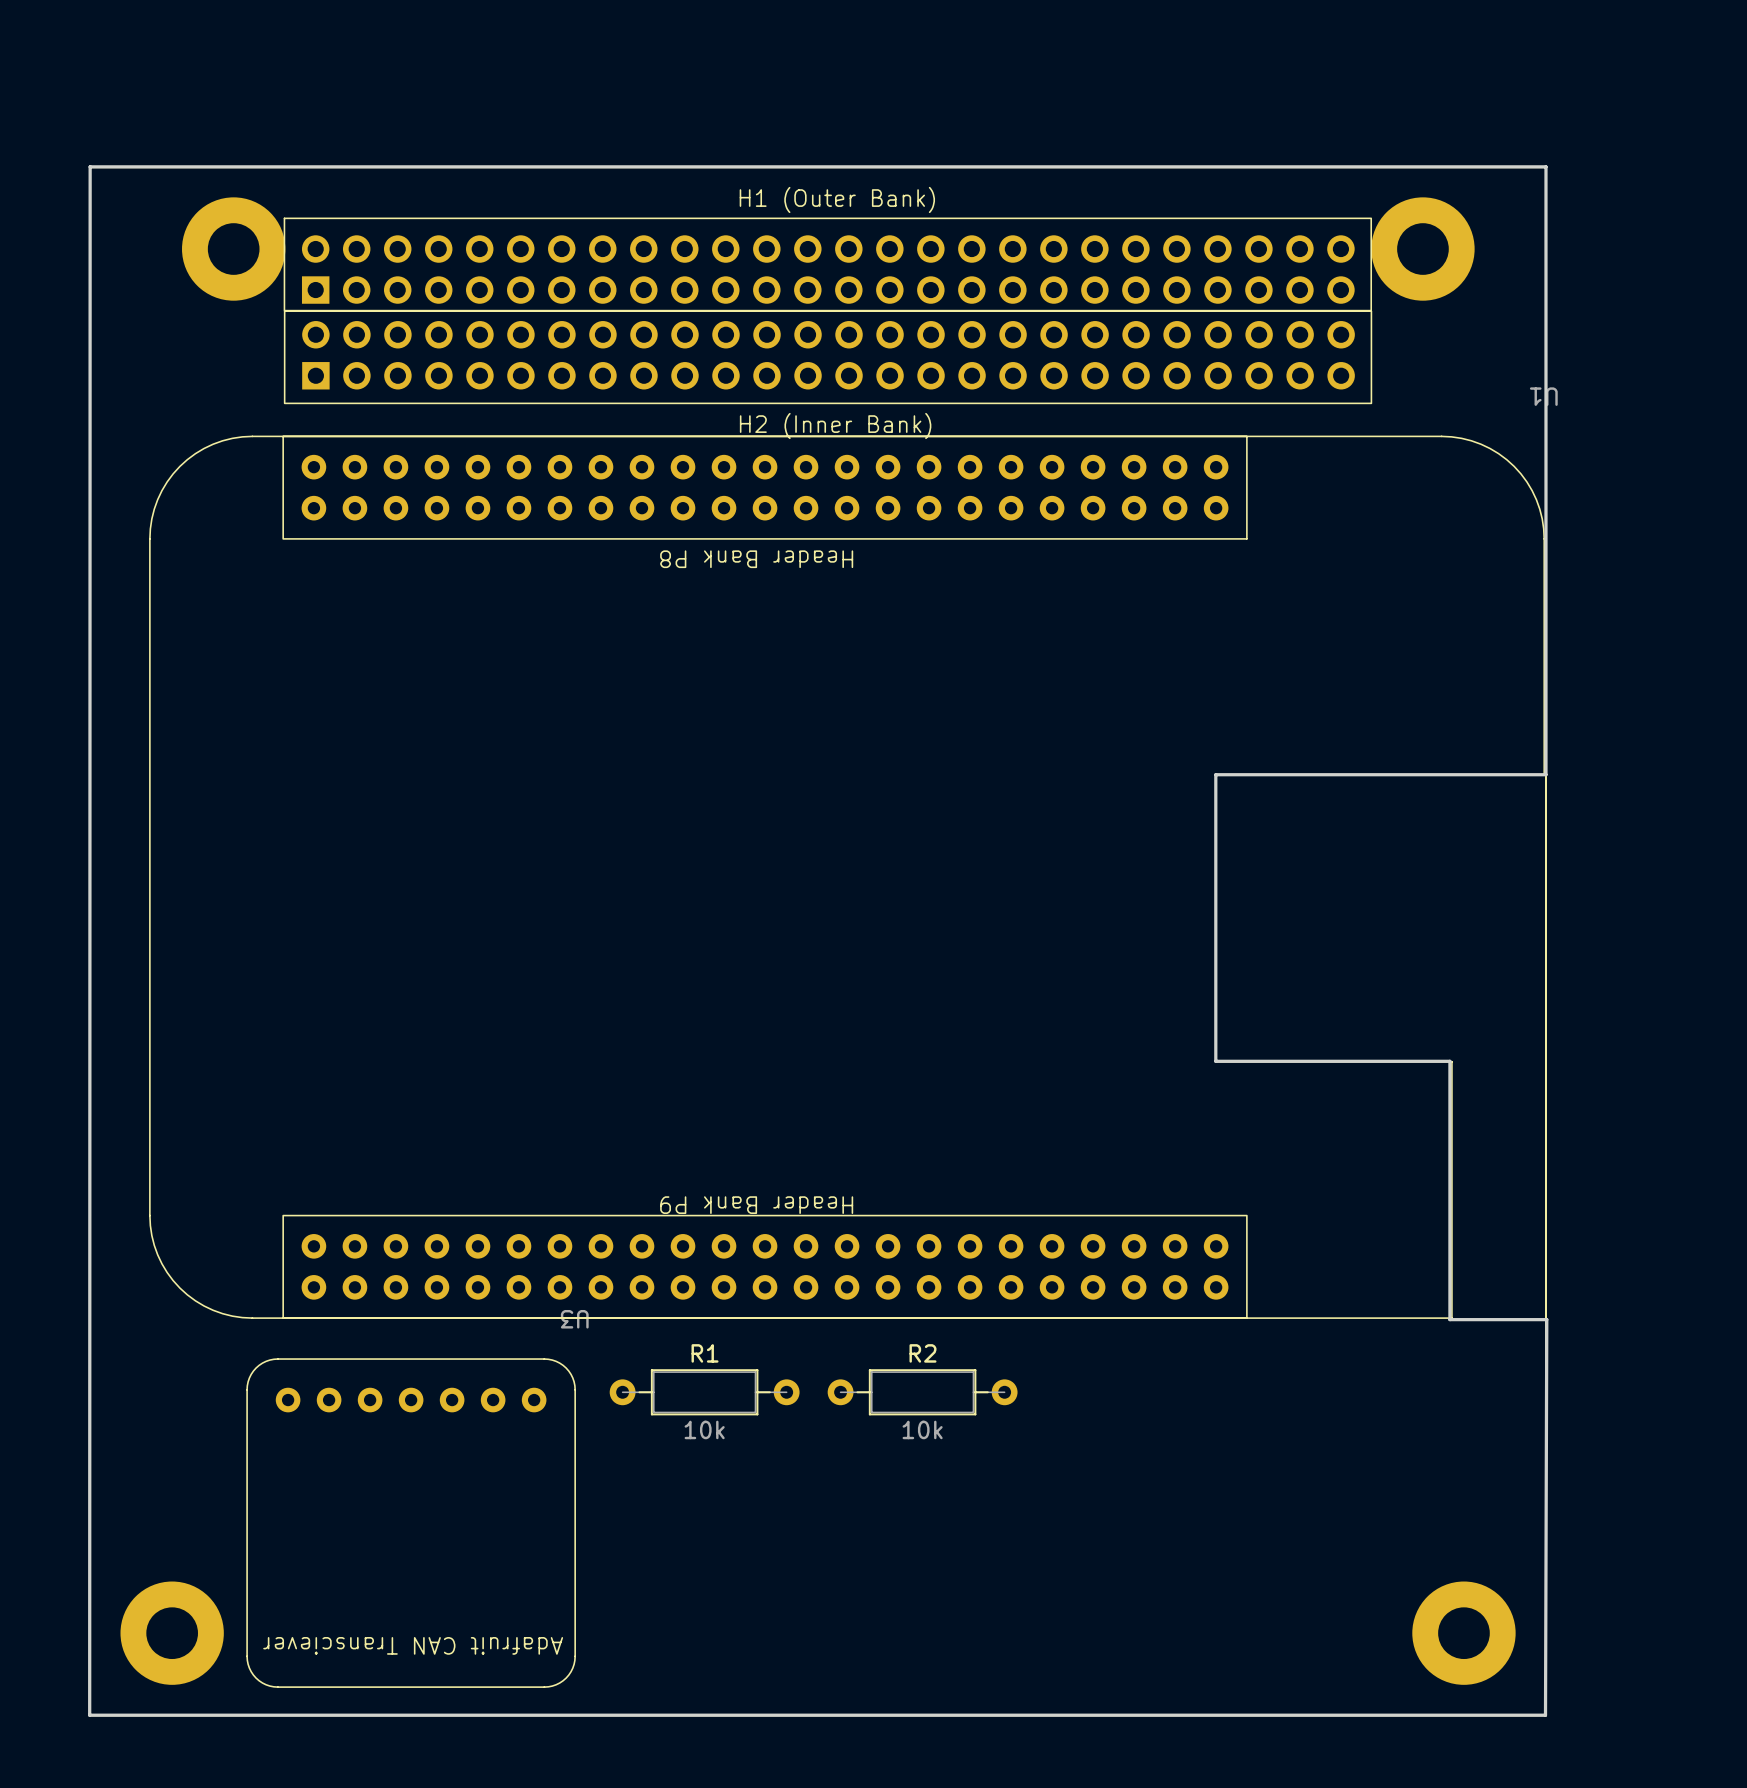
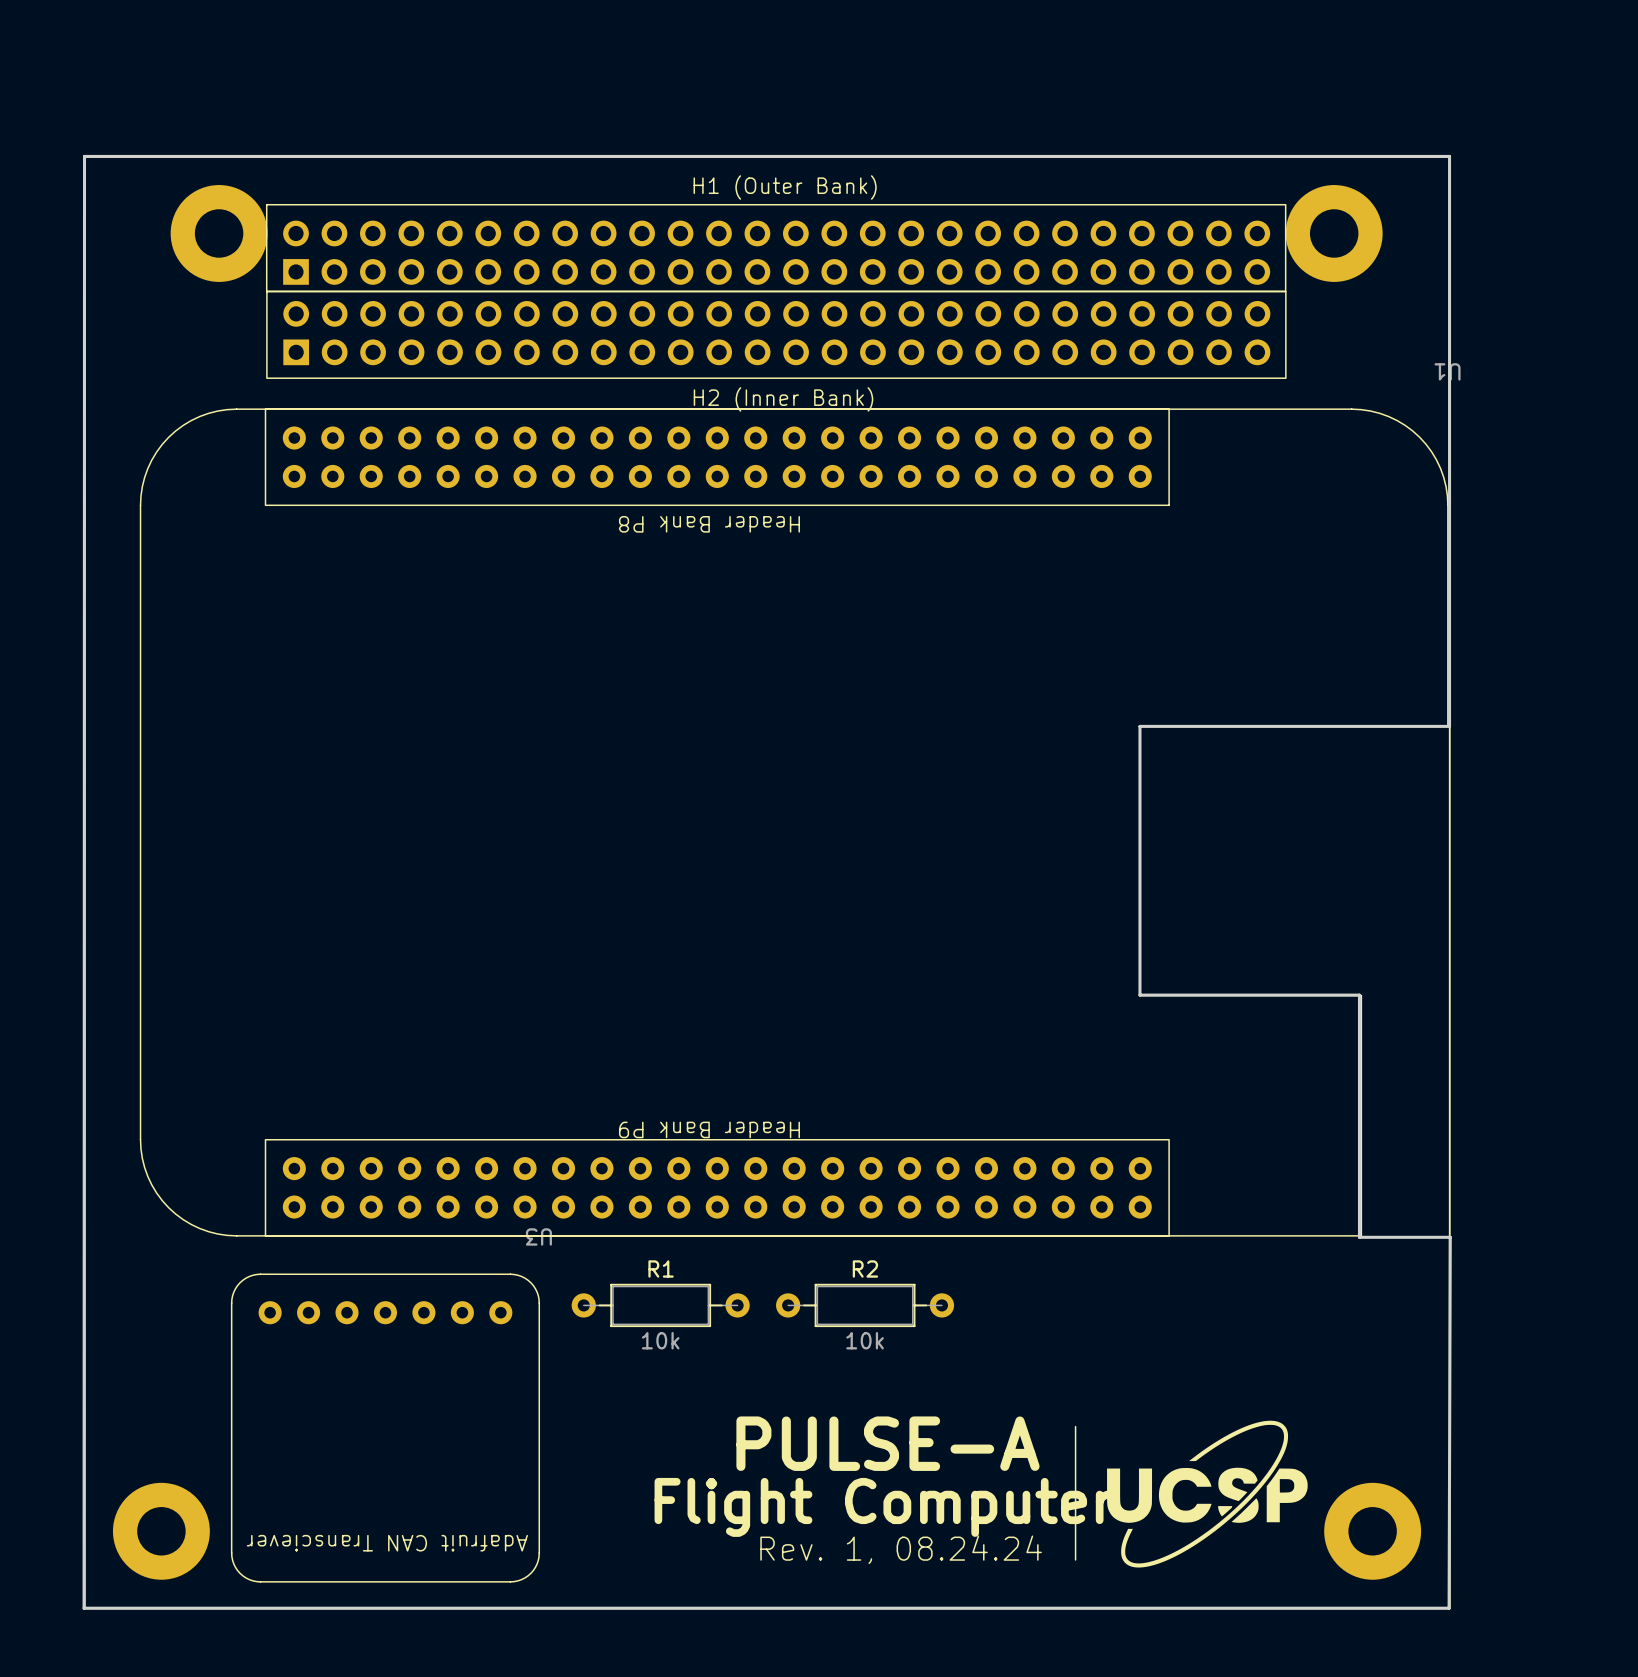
drawing: none -> [1107, 1420, 1308, 1568]
line: none -> (1075, 1426) (1075, 1559)
text: none -> PULSE-A (887, 1443)
text: none -> Flight Computer (884, 1507)
text: none -> Rev. 1, 08.24.24 (901, 1549)

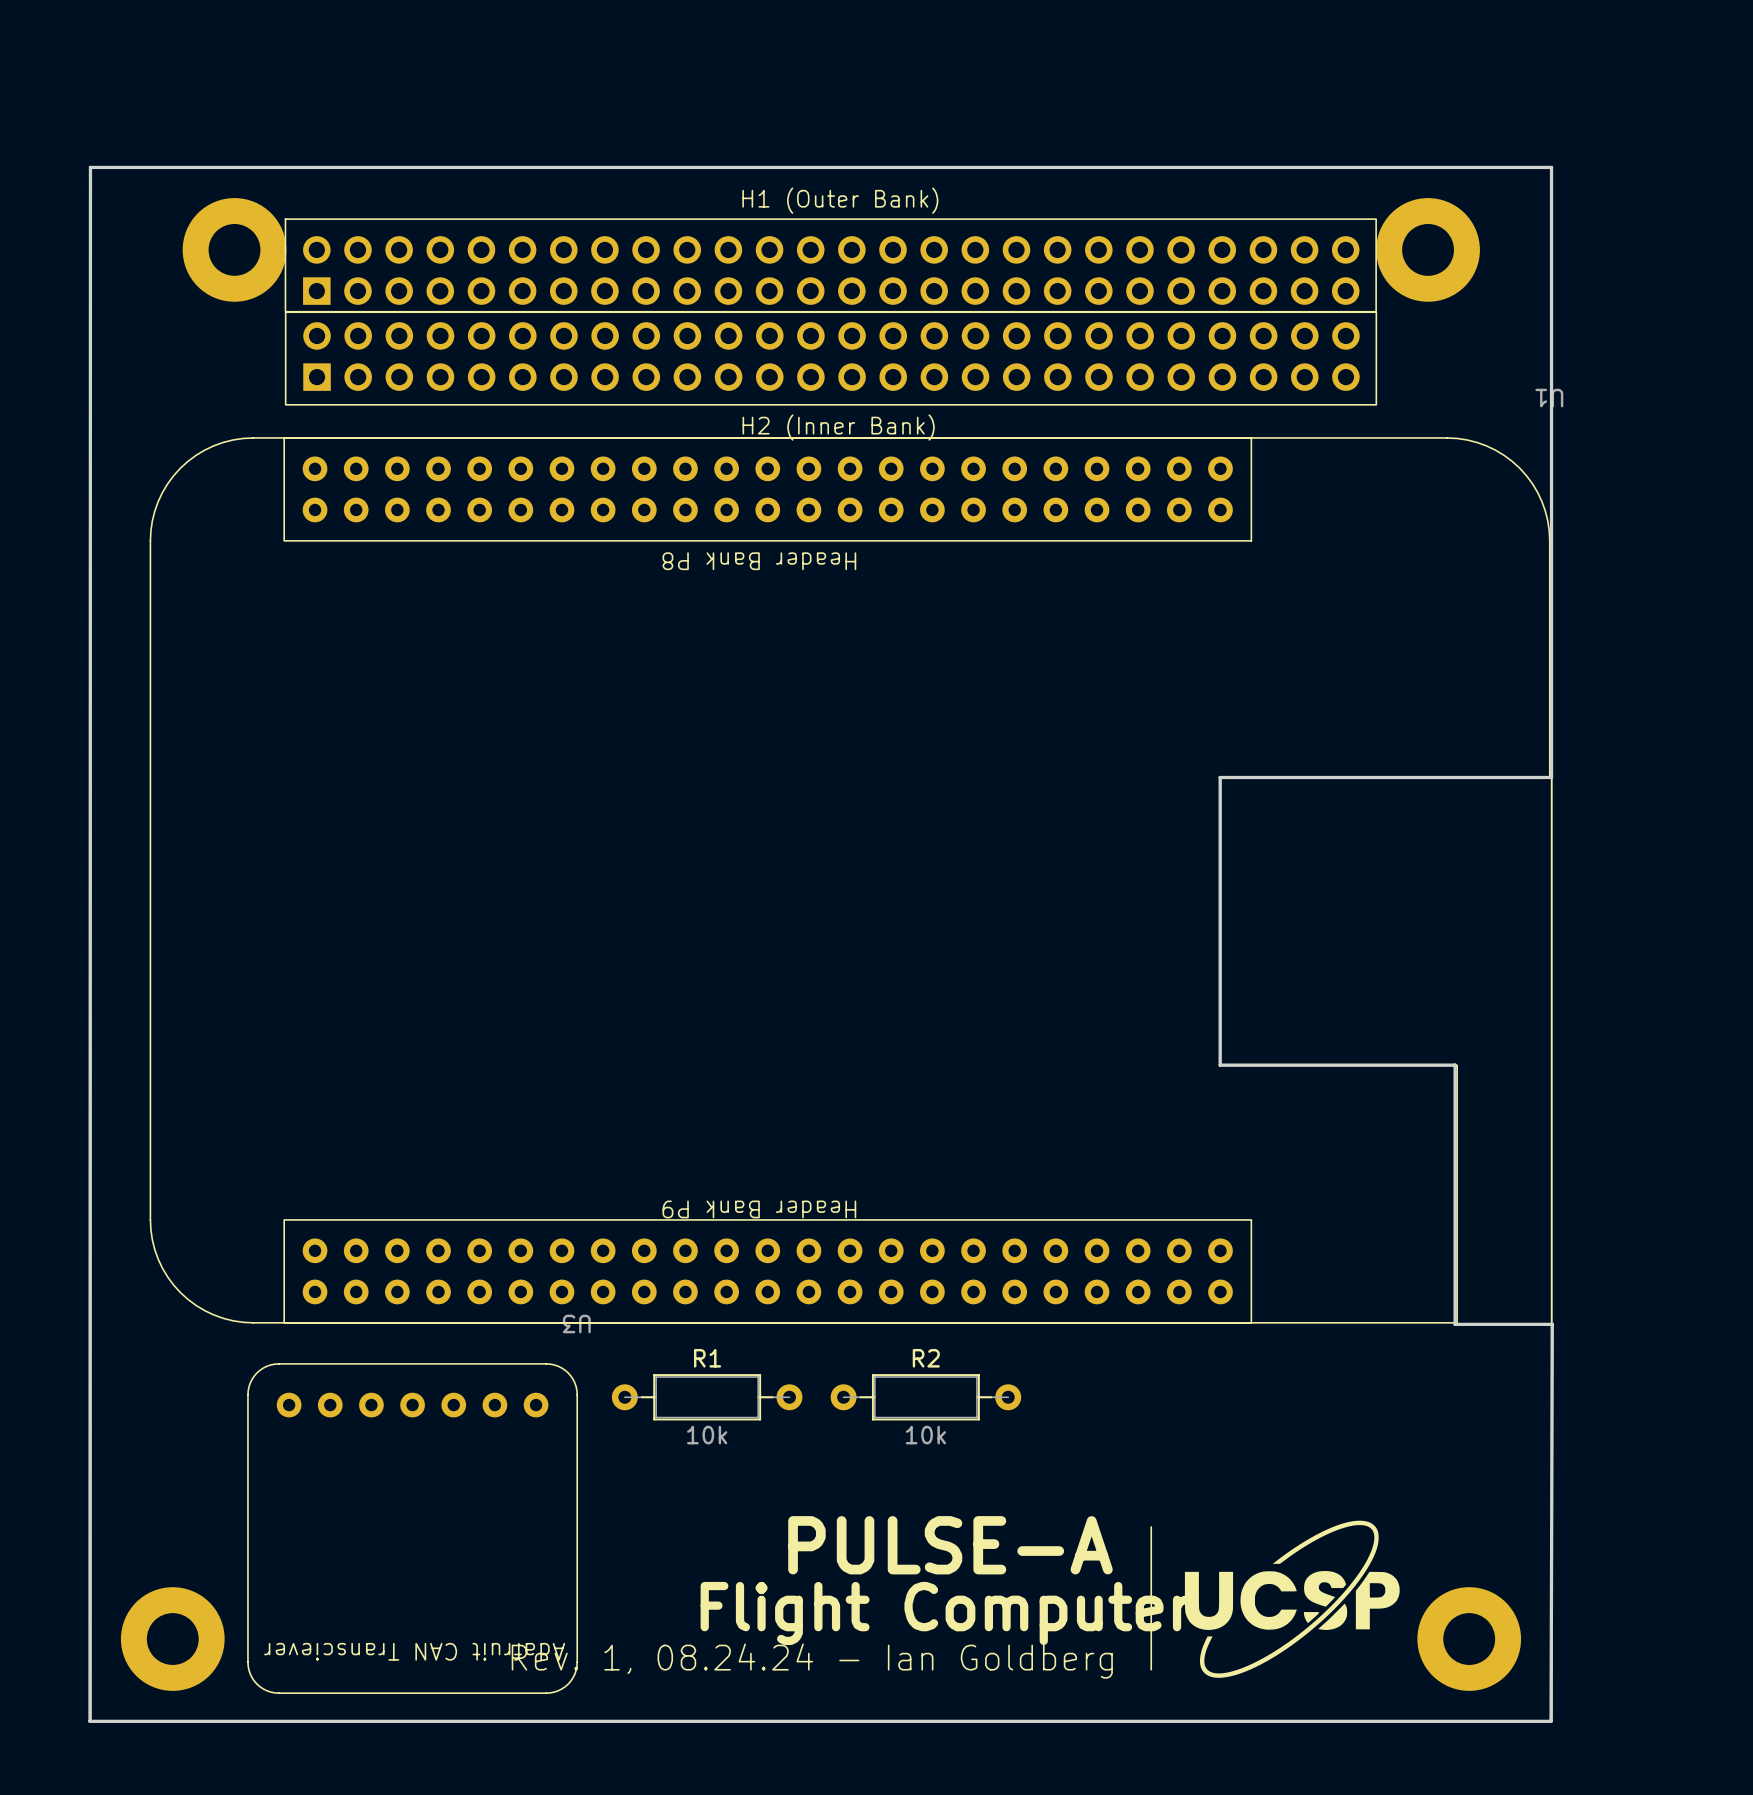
text: Rev. 1, 08.24.24 (901, 1549) -> Rev. 1, 08.24.24 - Ian Goldberg (812, 1661)

